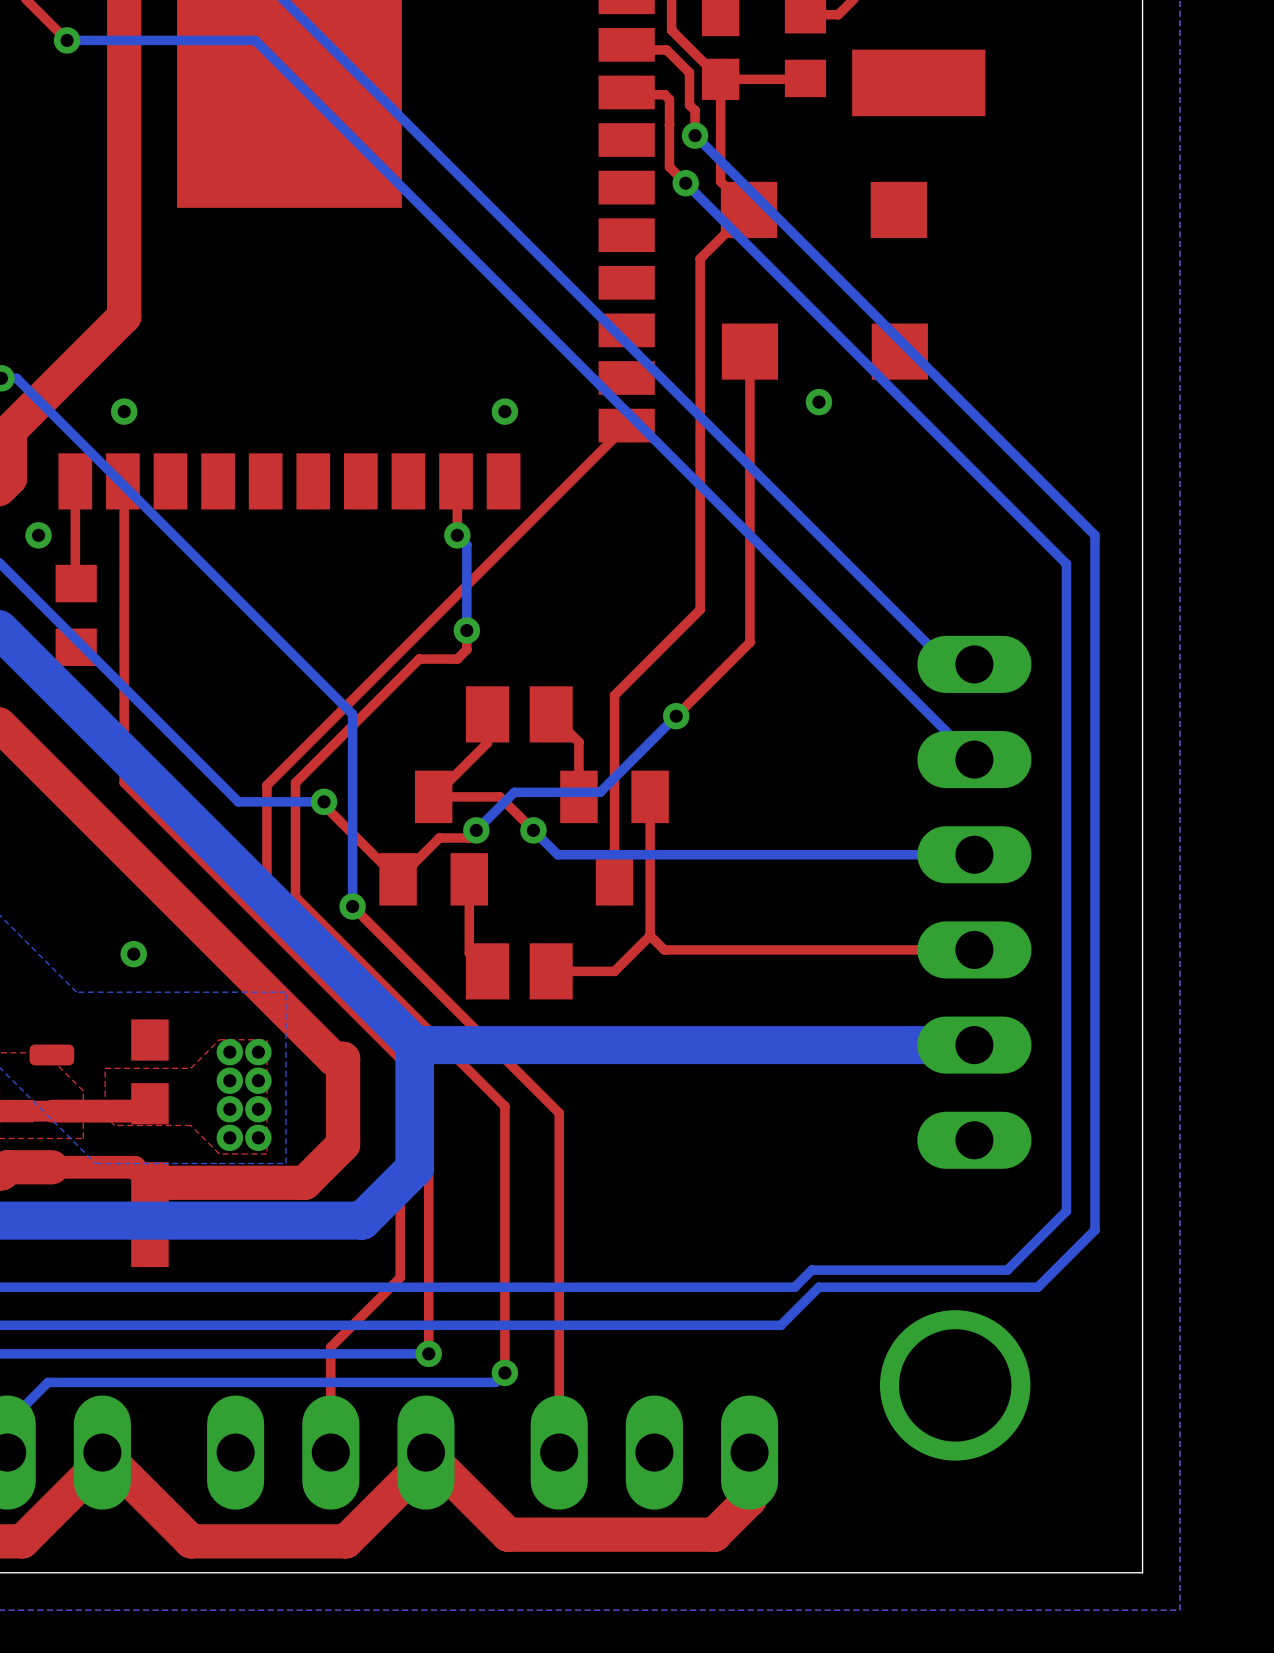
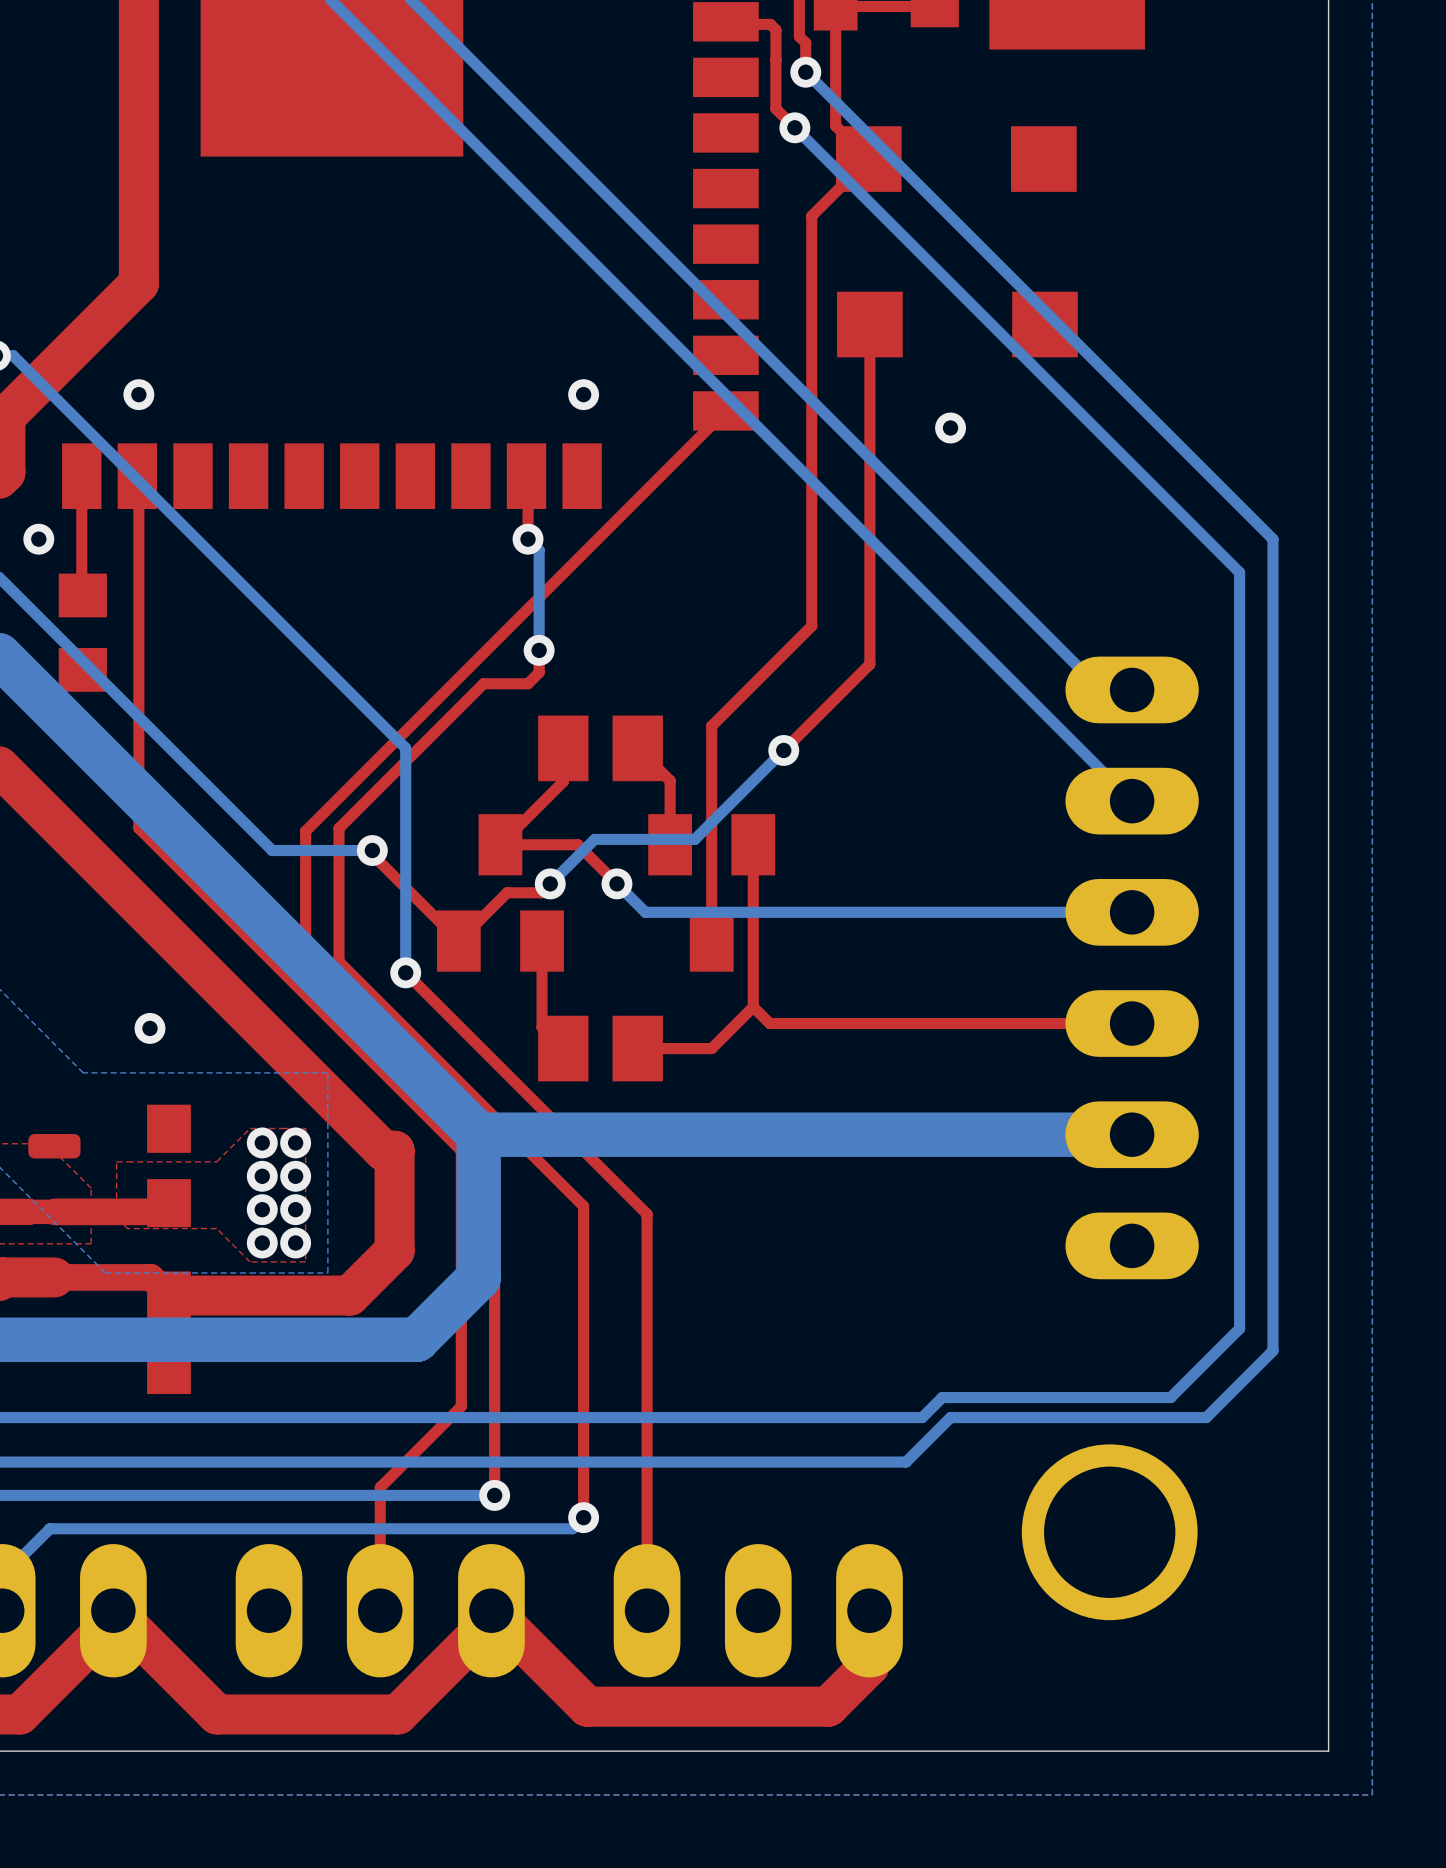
via position: (818, 402) -> (950, 428)

